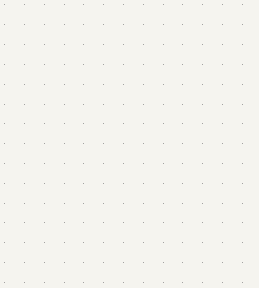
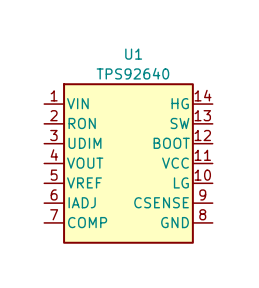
U1: none -> TPS92640 (128, 163)

